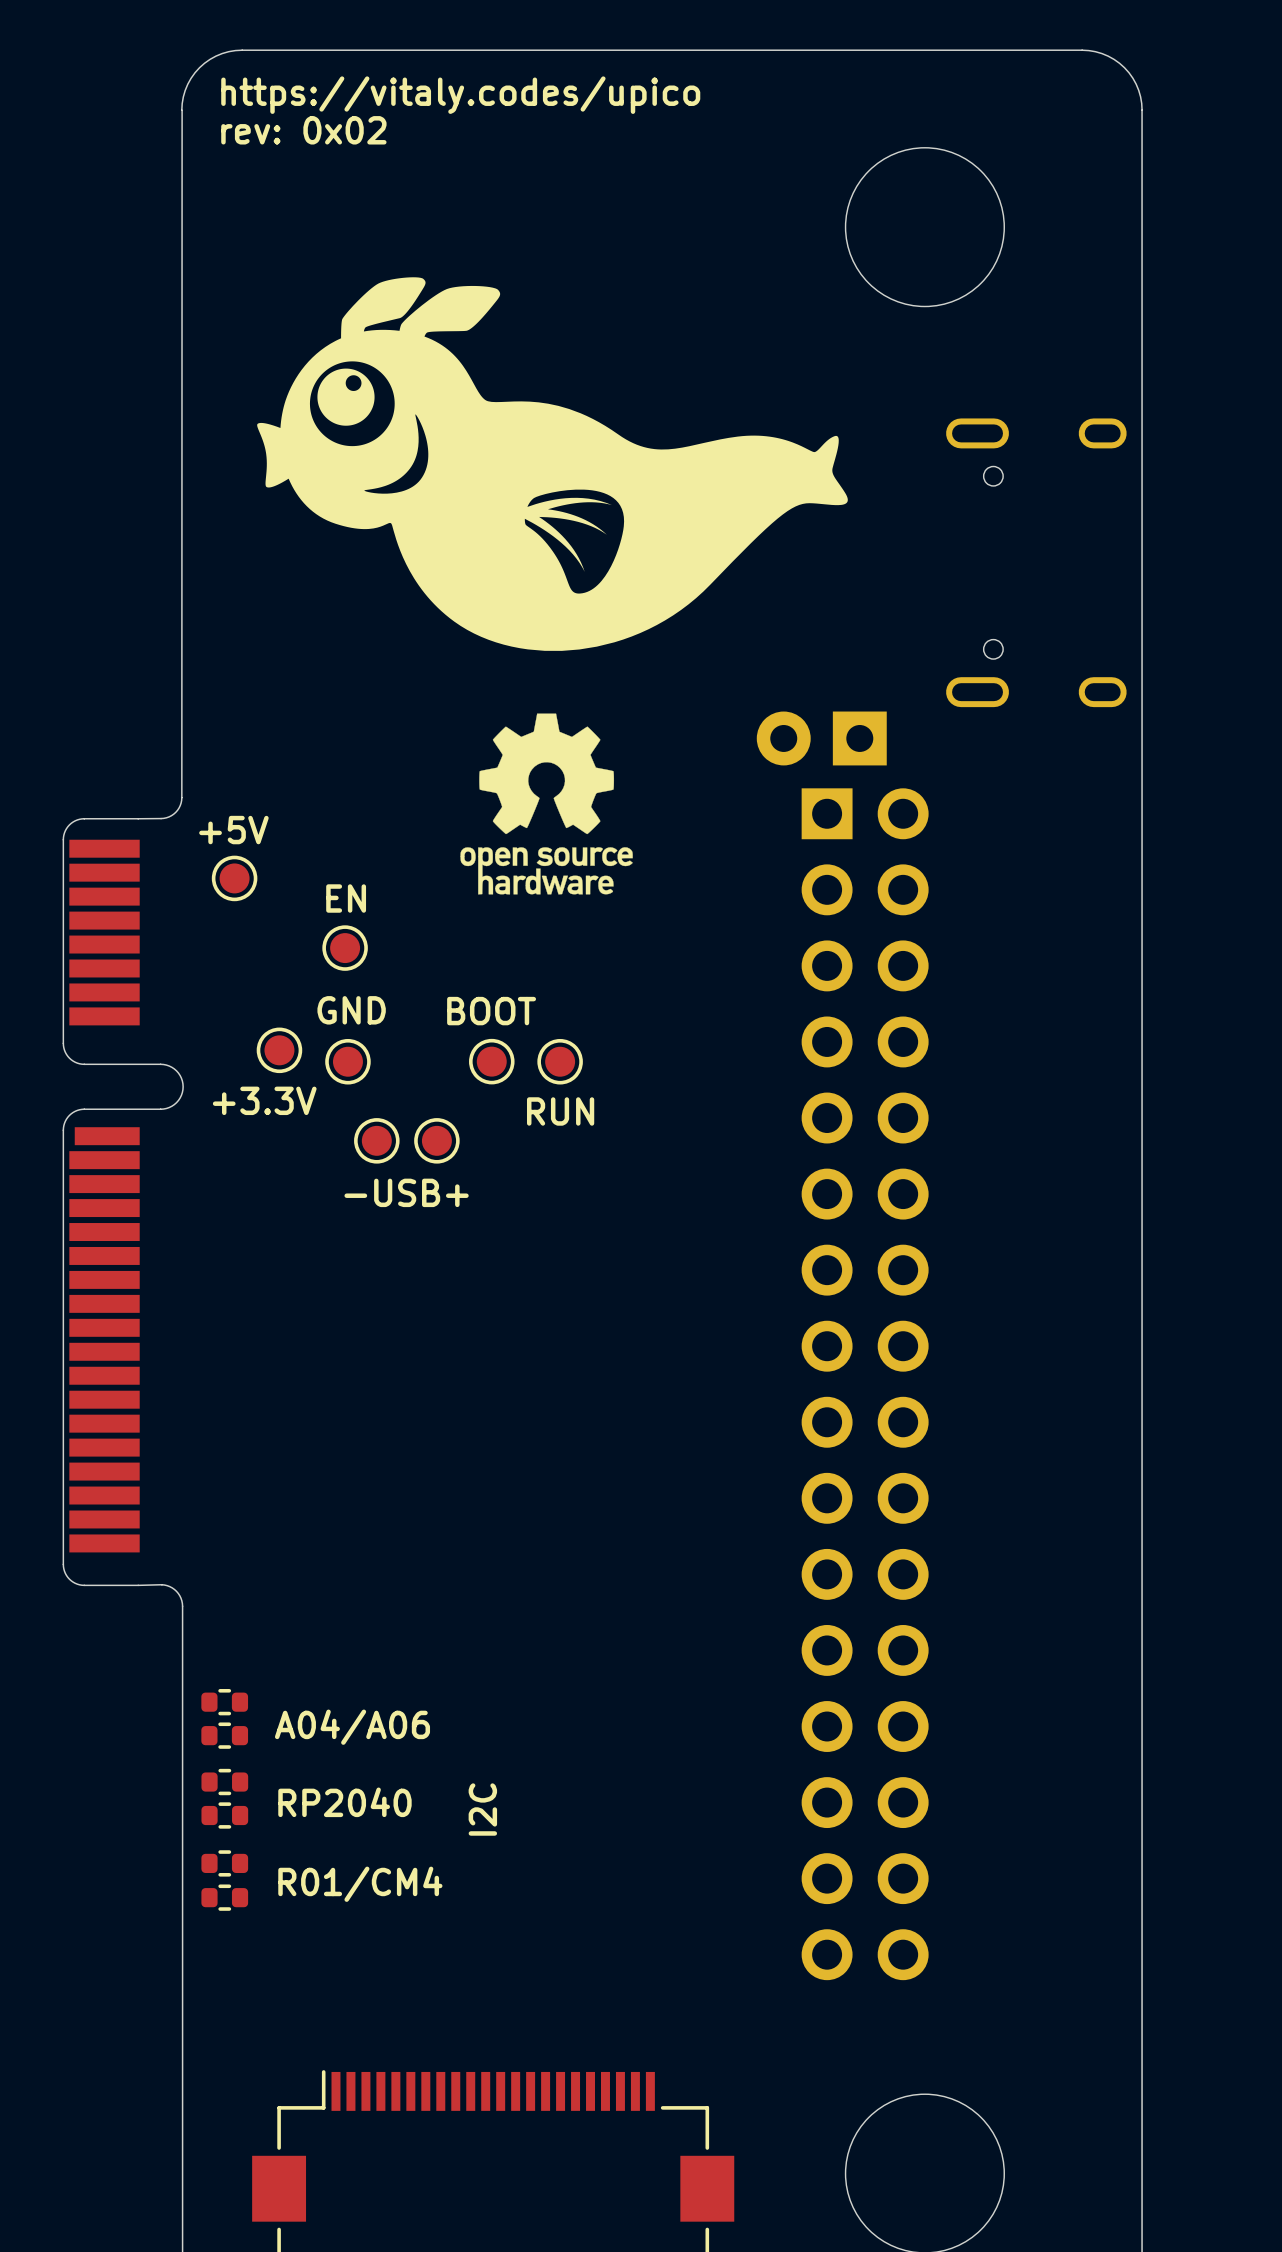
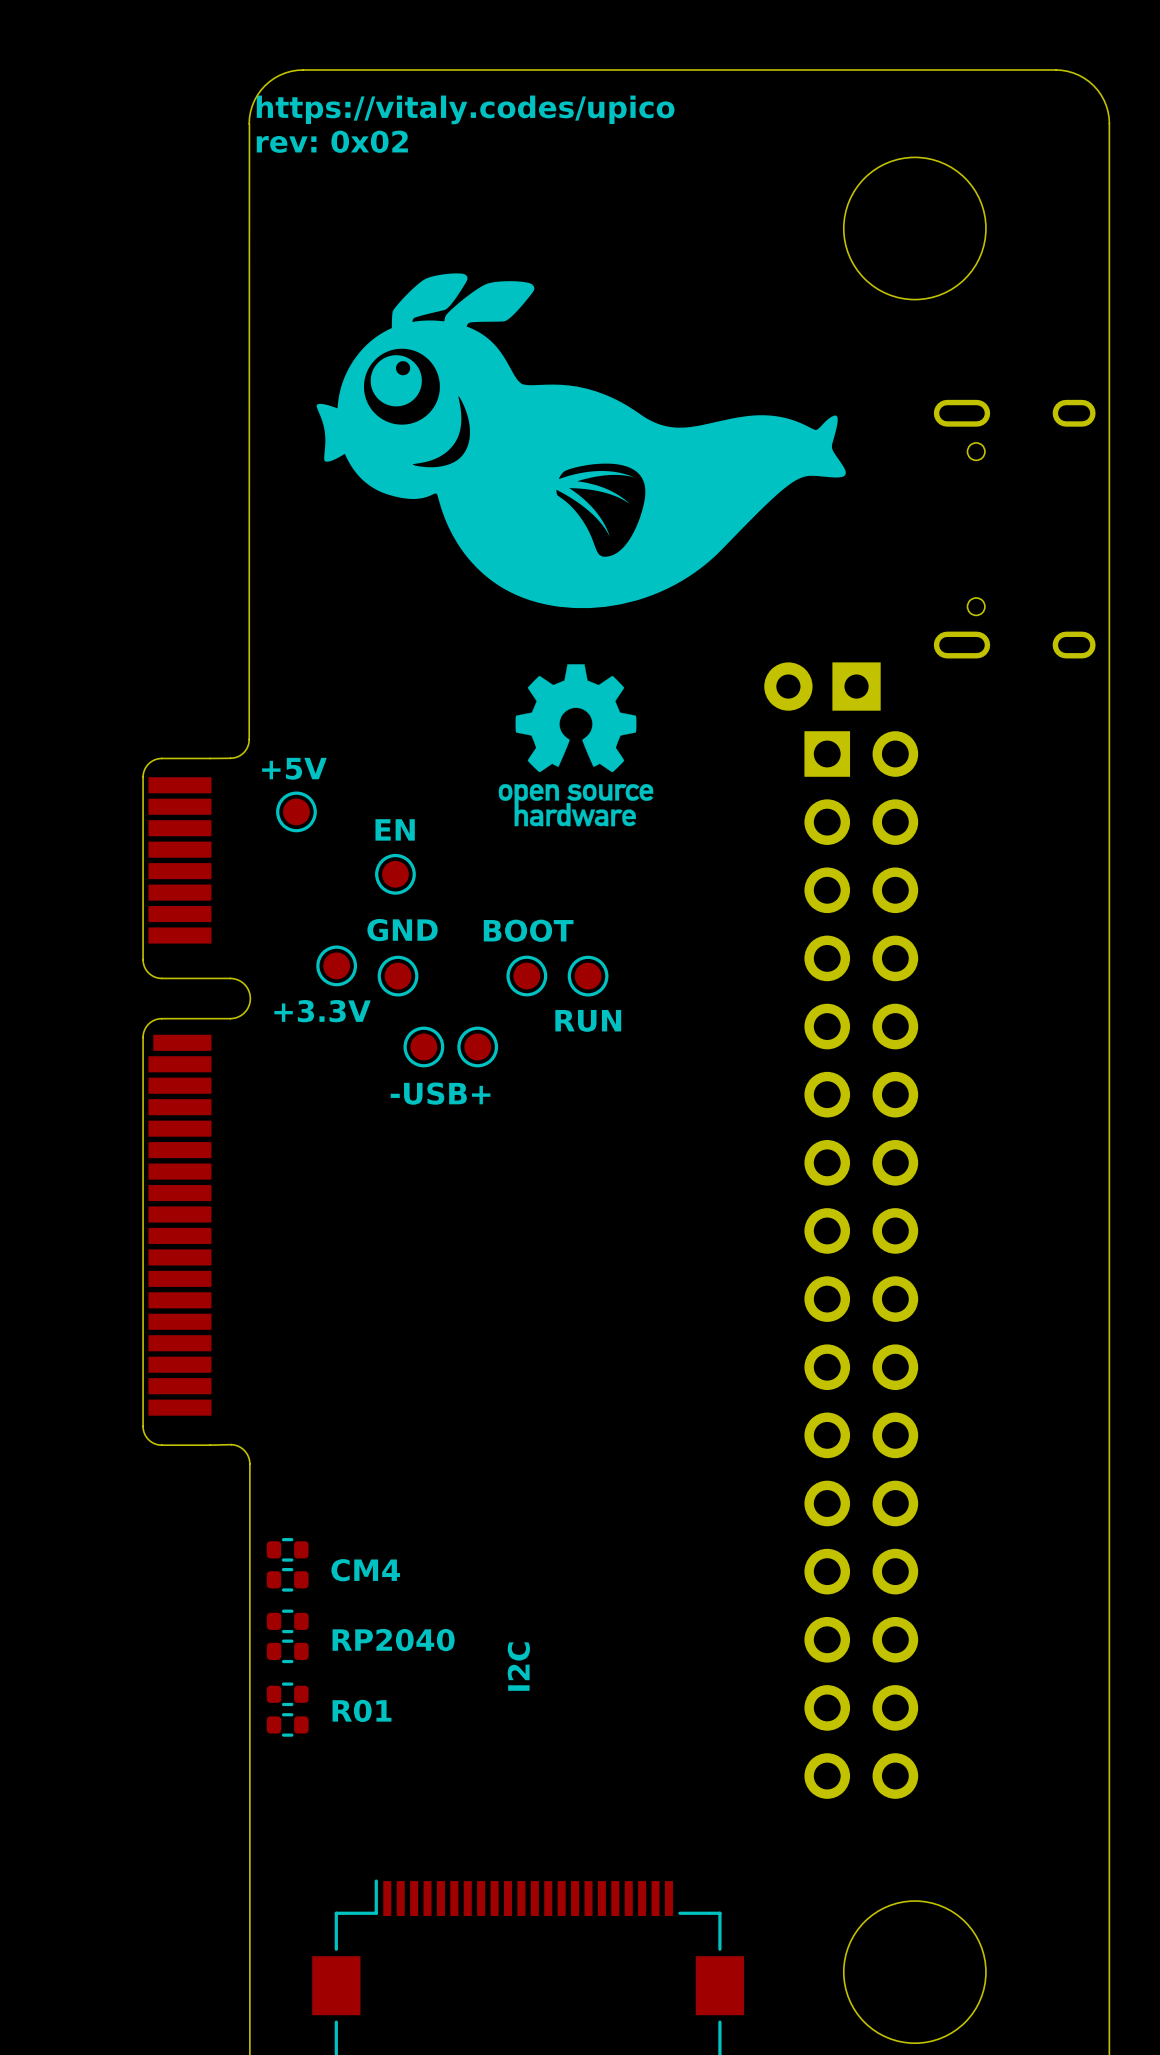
text: A04/A06 (352, 1727) -> CM4 (365, 1570)
text: R01/CM4 (360, 1884) -> R01 (362, 1710)

